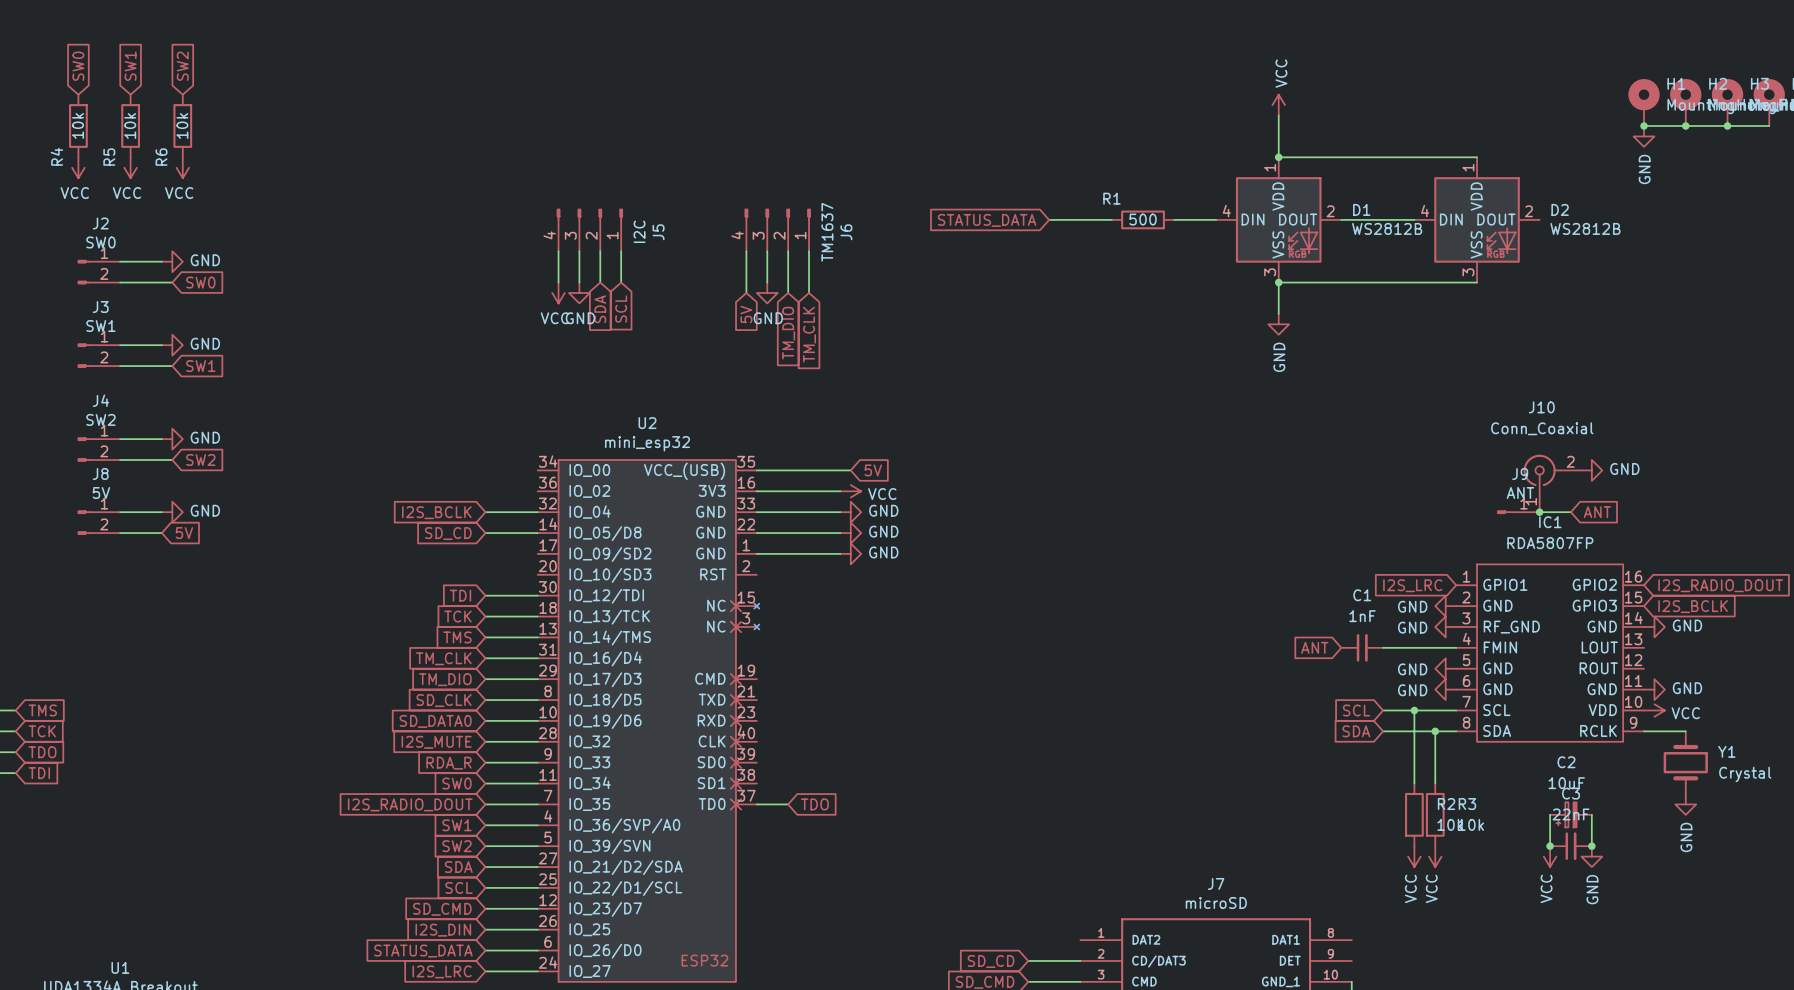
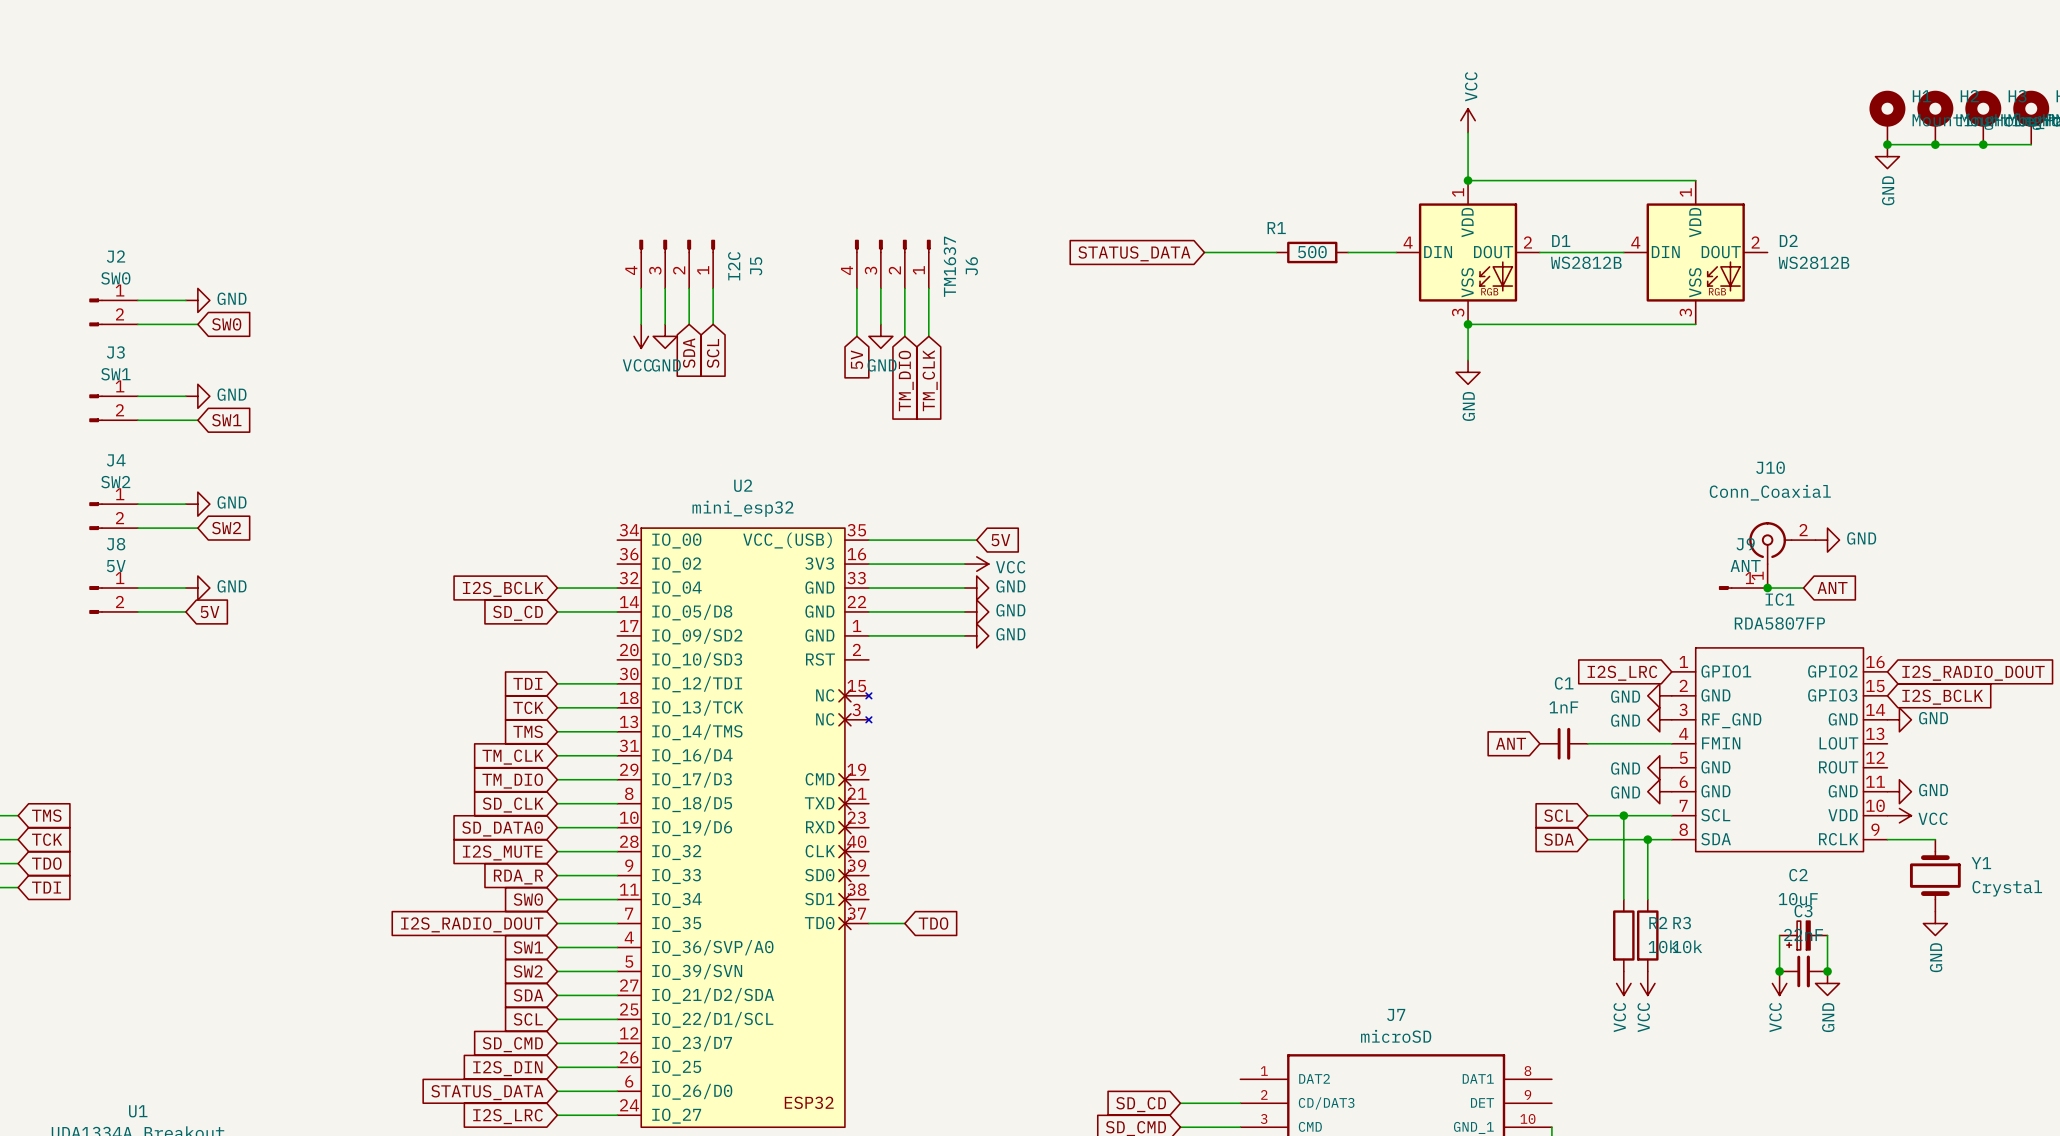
global label: SW0 (78, 66) -> none
global label: SW1 (130, 66) -> none
global label: SW2 (182, 66) -> none
R4: 10k (78, 125) -> none
R5: 10k (130, 125) -> none
R6: 10k (182, 125) -> none
power symbol: VCC (78, 167) -> none
power symbol: VCC (130, 167) -> none
power symbol: VCC (182, 167) -> none

